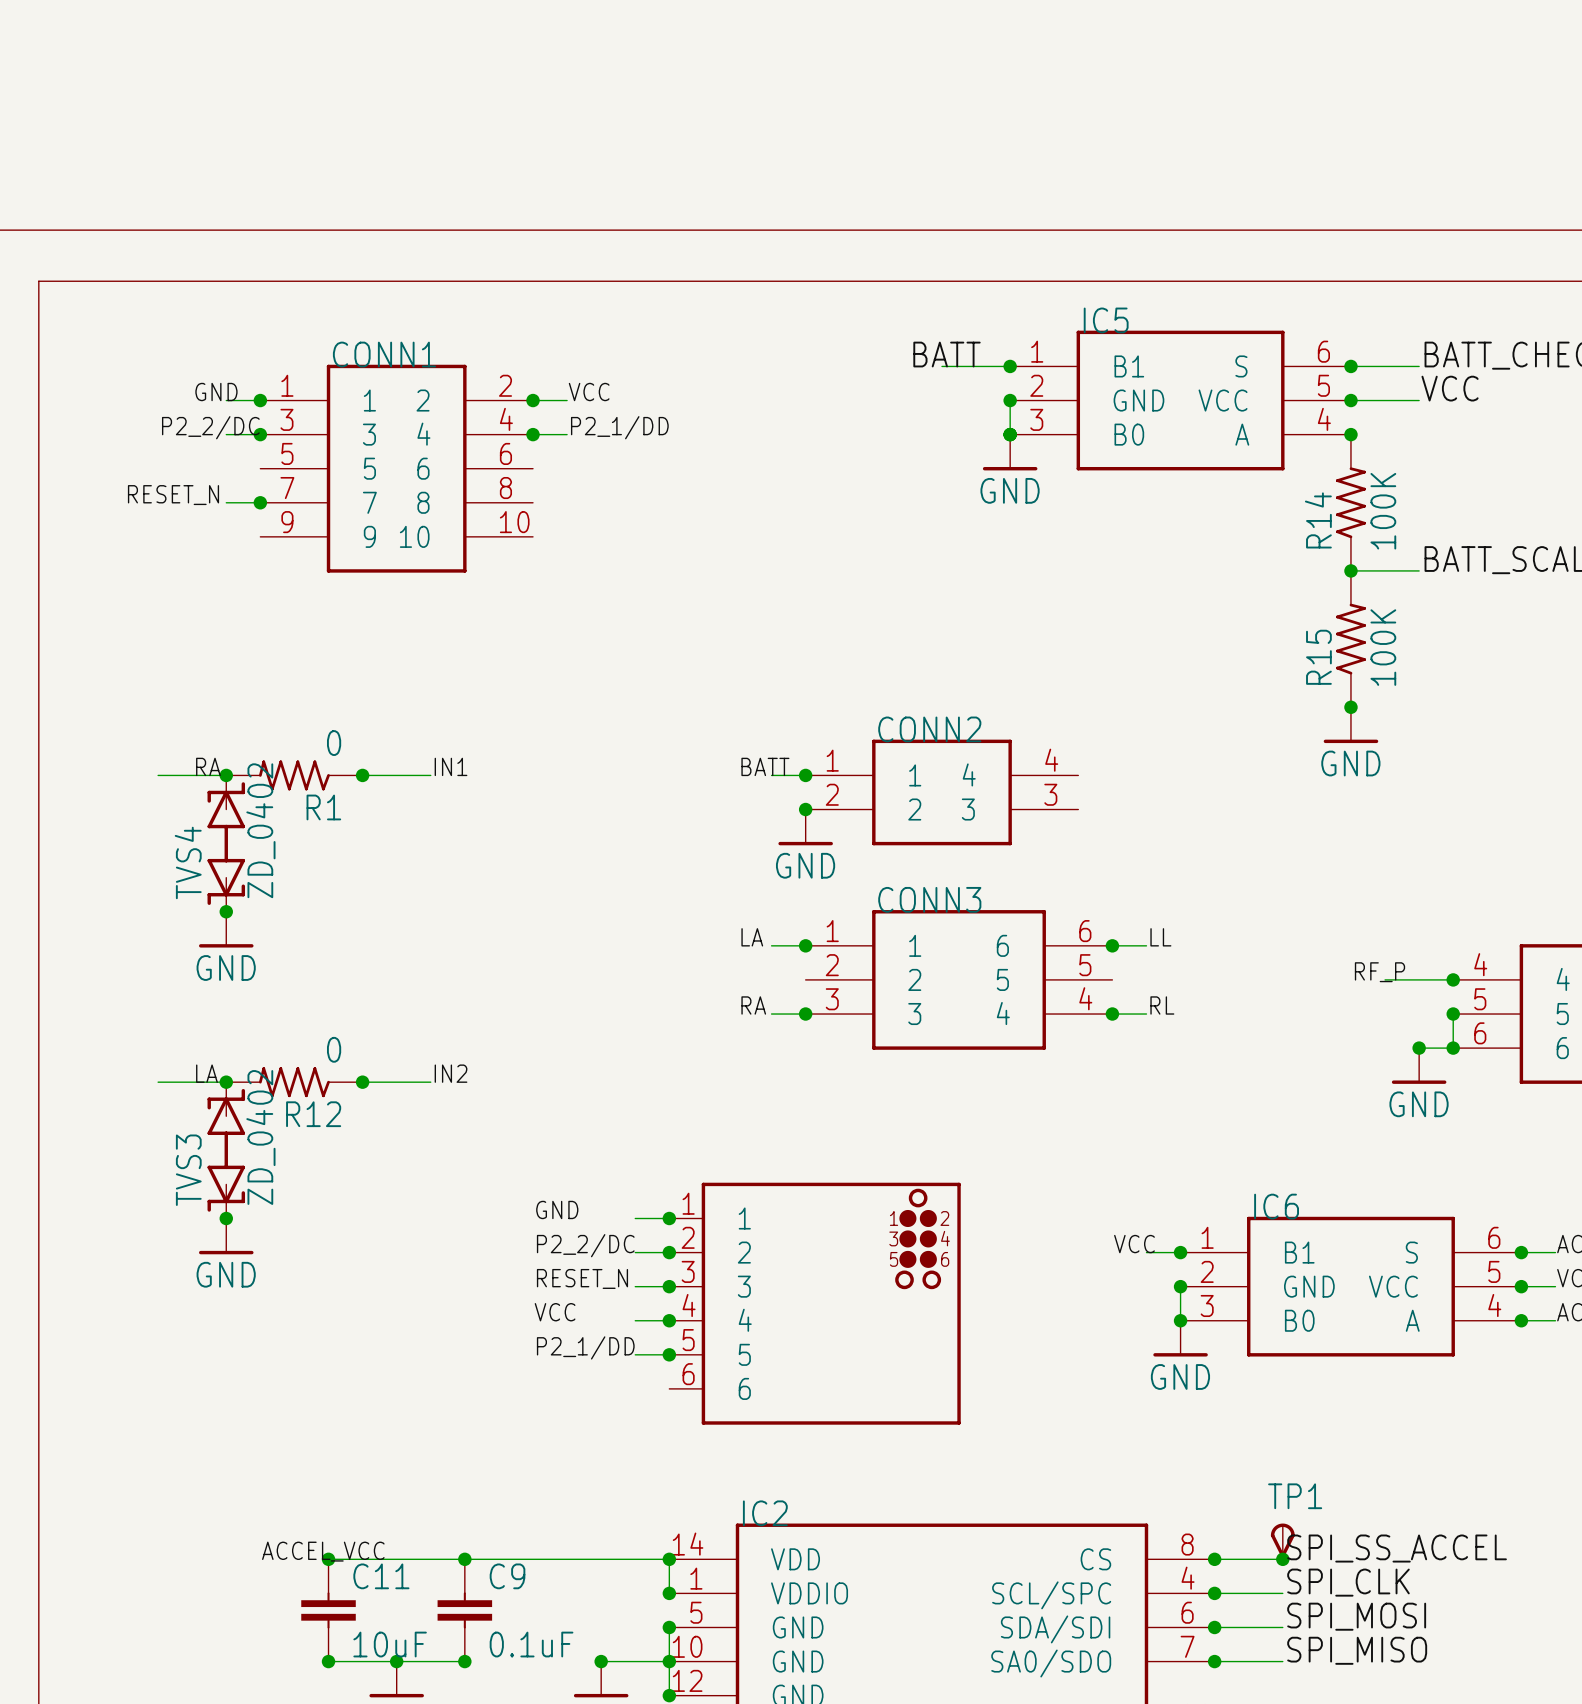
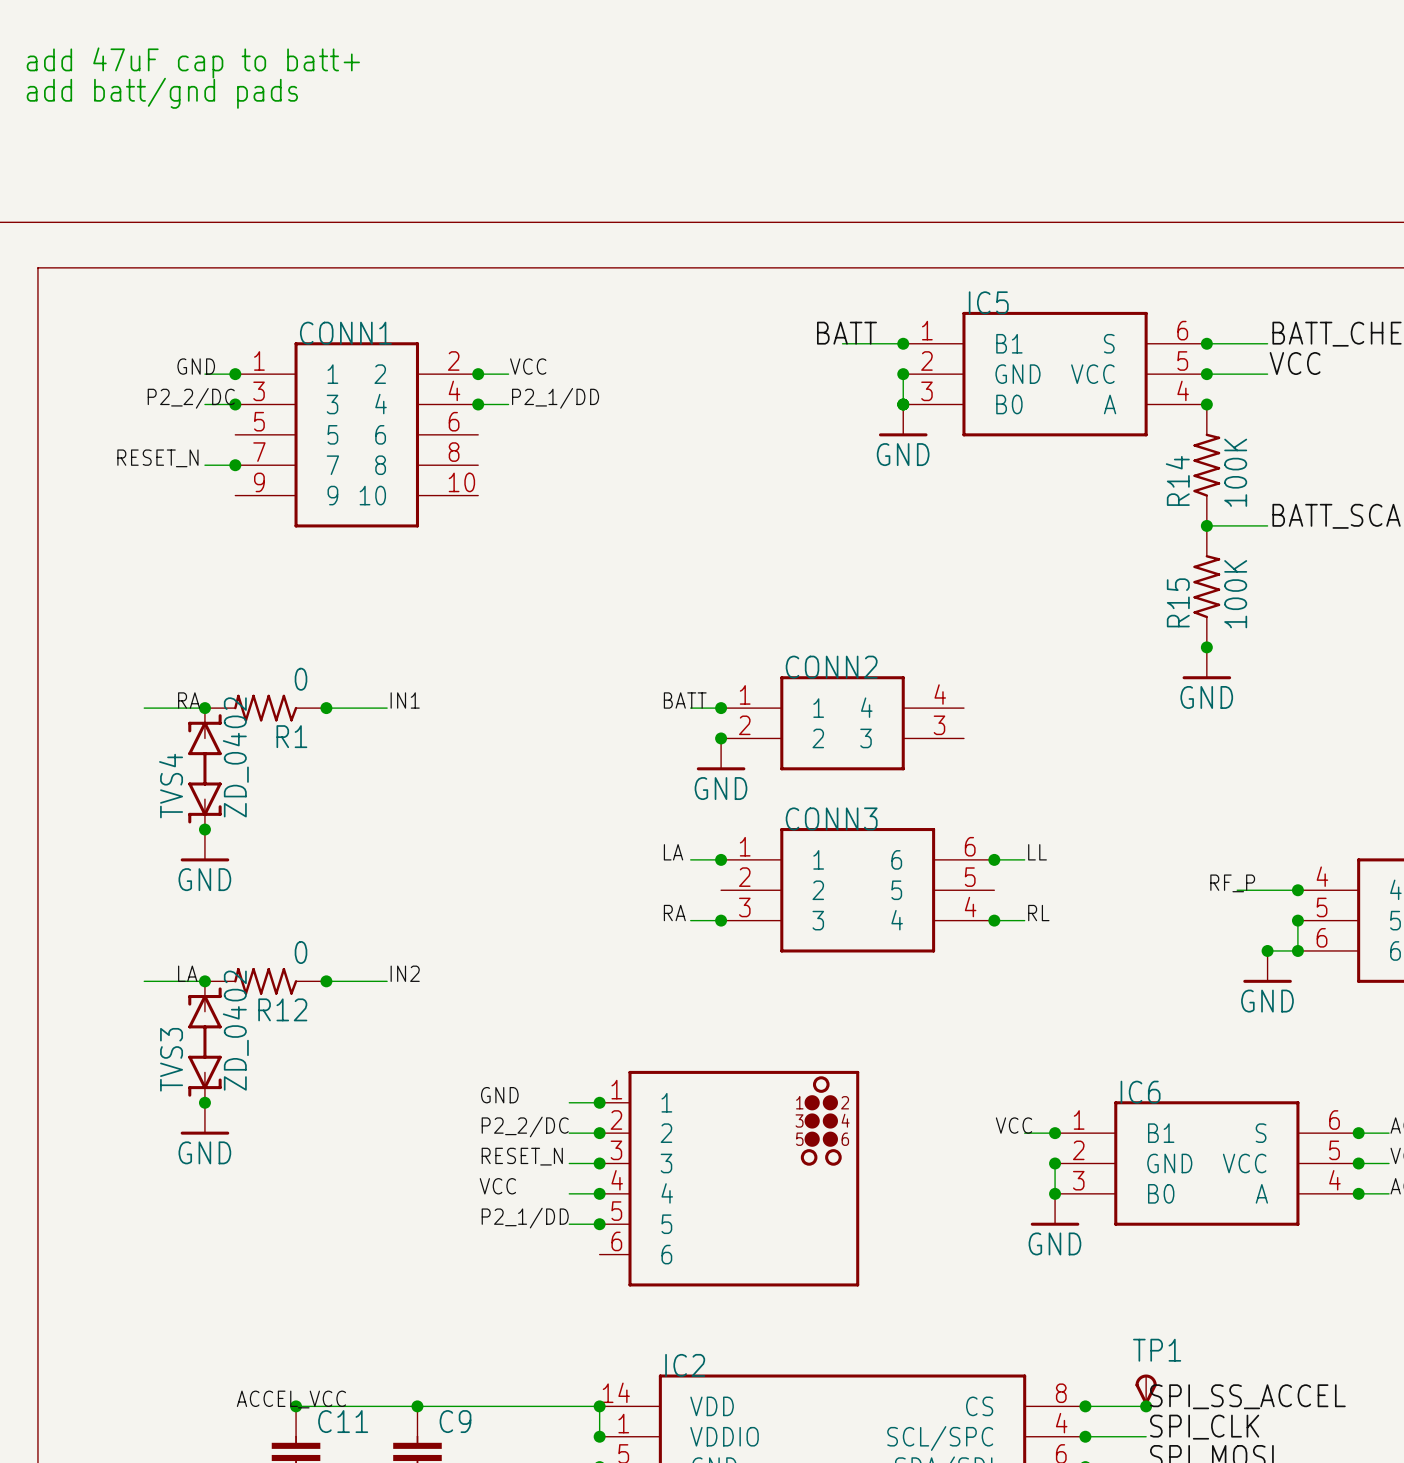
text: none -> add 47uF cap to batt+ (193, 62)
text: none -> add batt/gnd pads (162, 93)

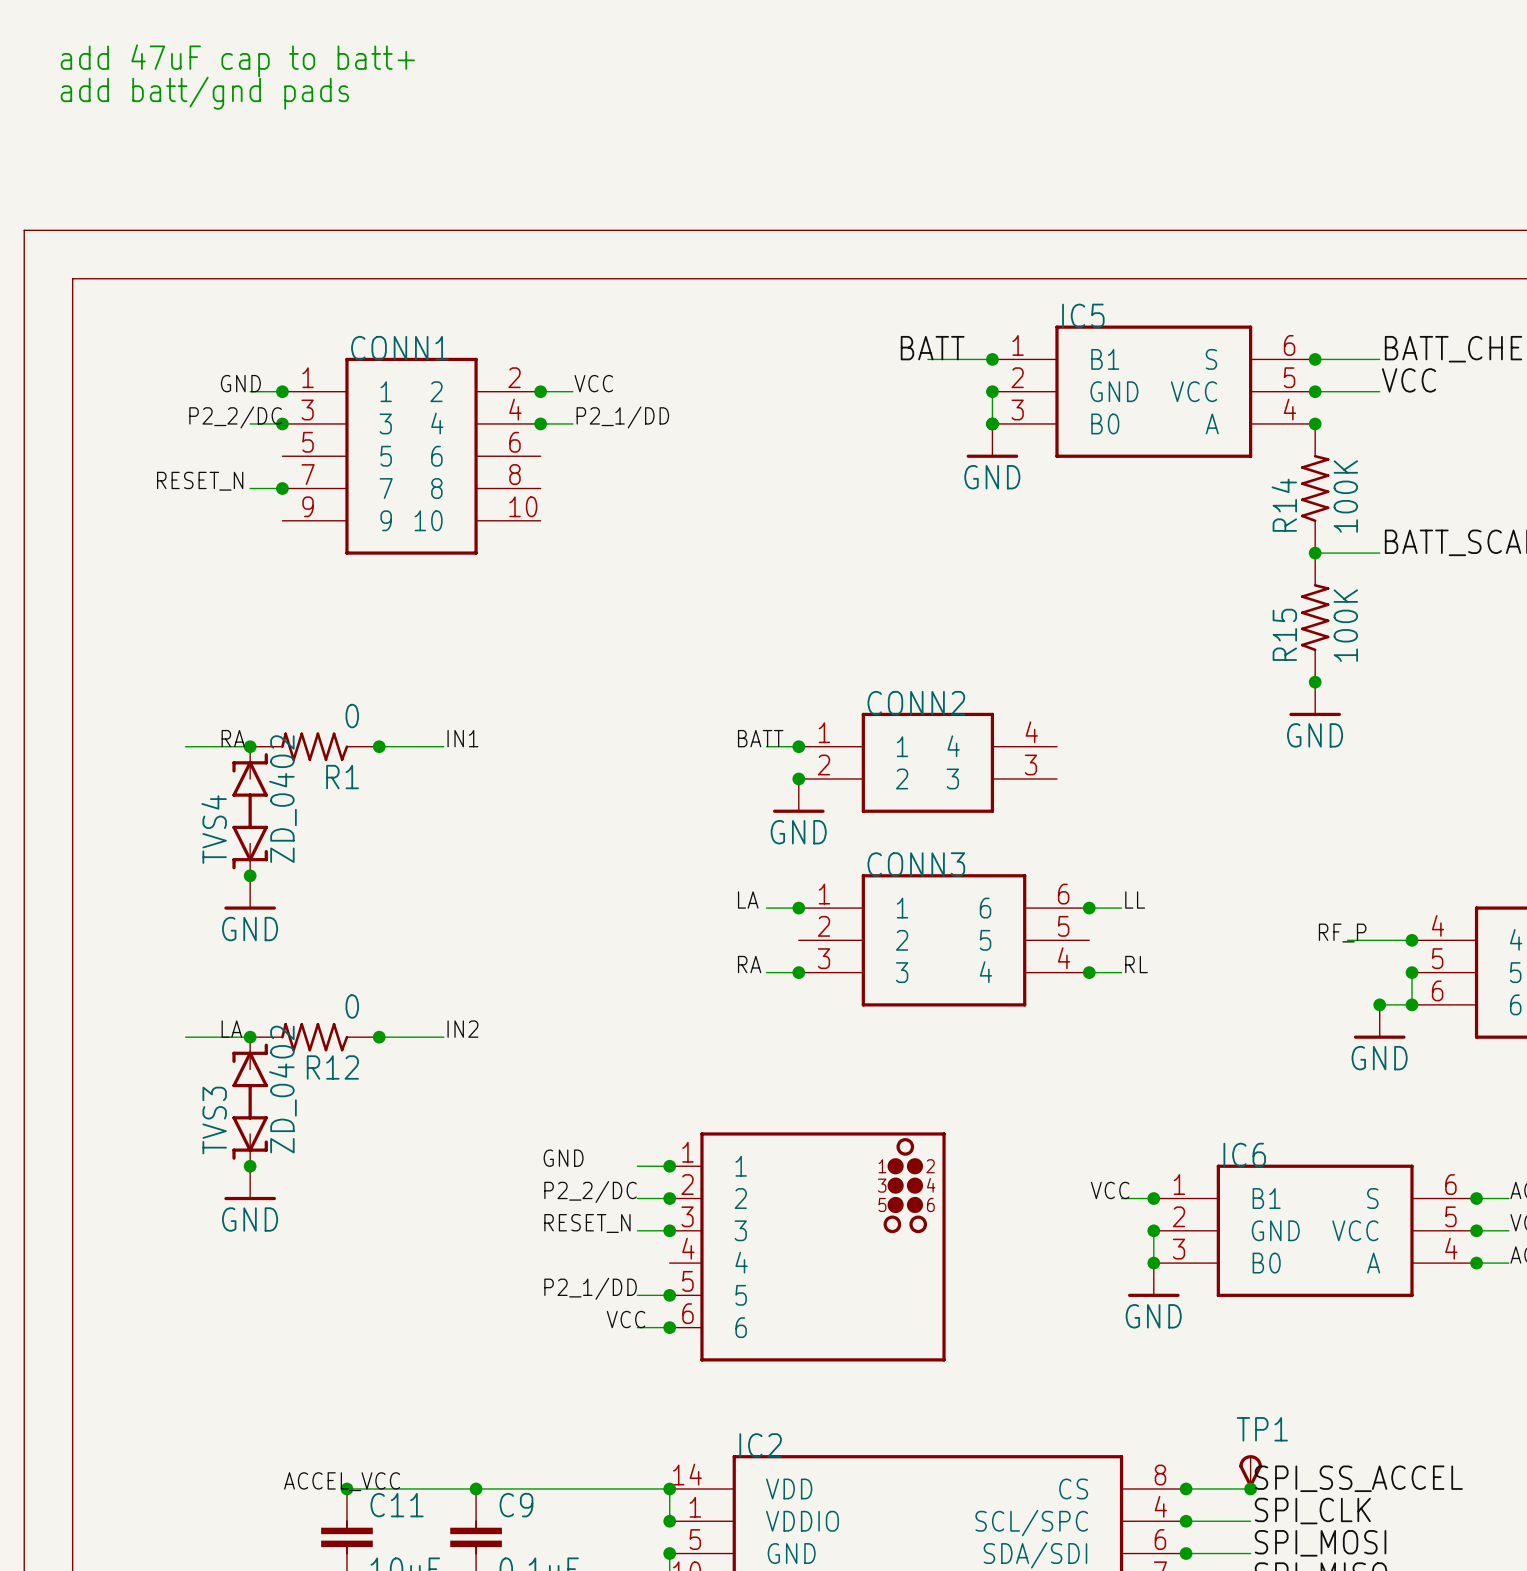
label position: VCC (497, 1186) -> VCC (626, 1319)
wire: (569, 1193) (599, 1193) -> (637, 1327) (669, 1327)
junction position: (599, 1193) -> (669, 1327)

